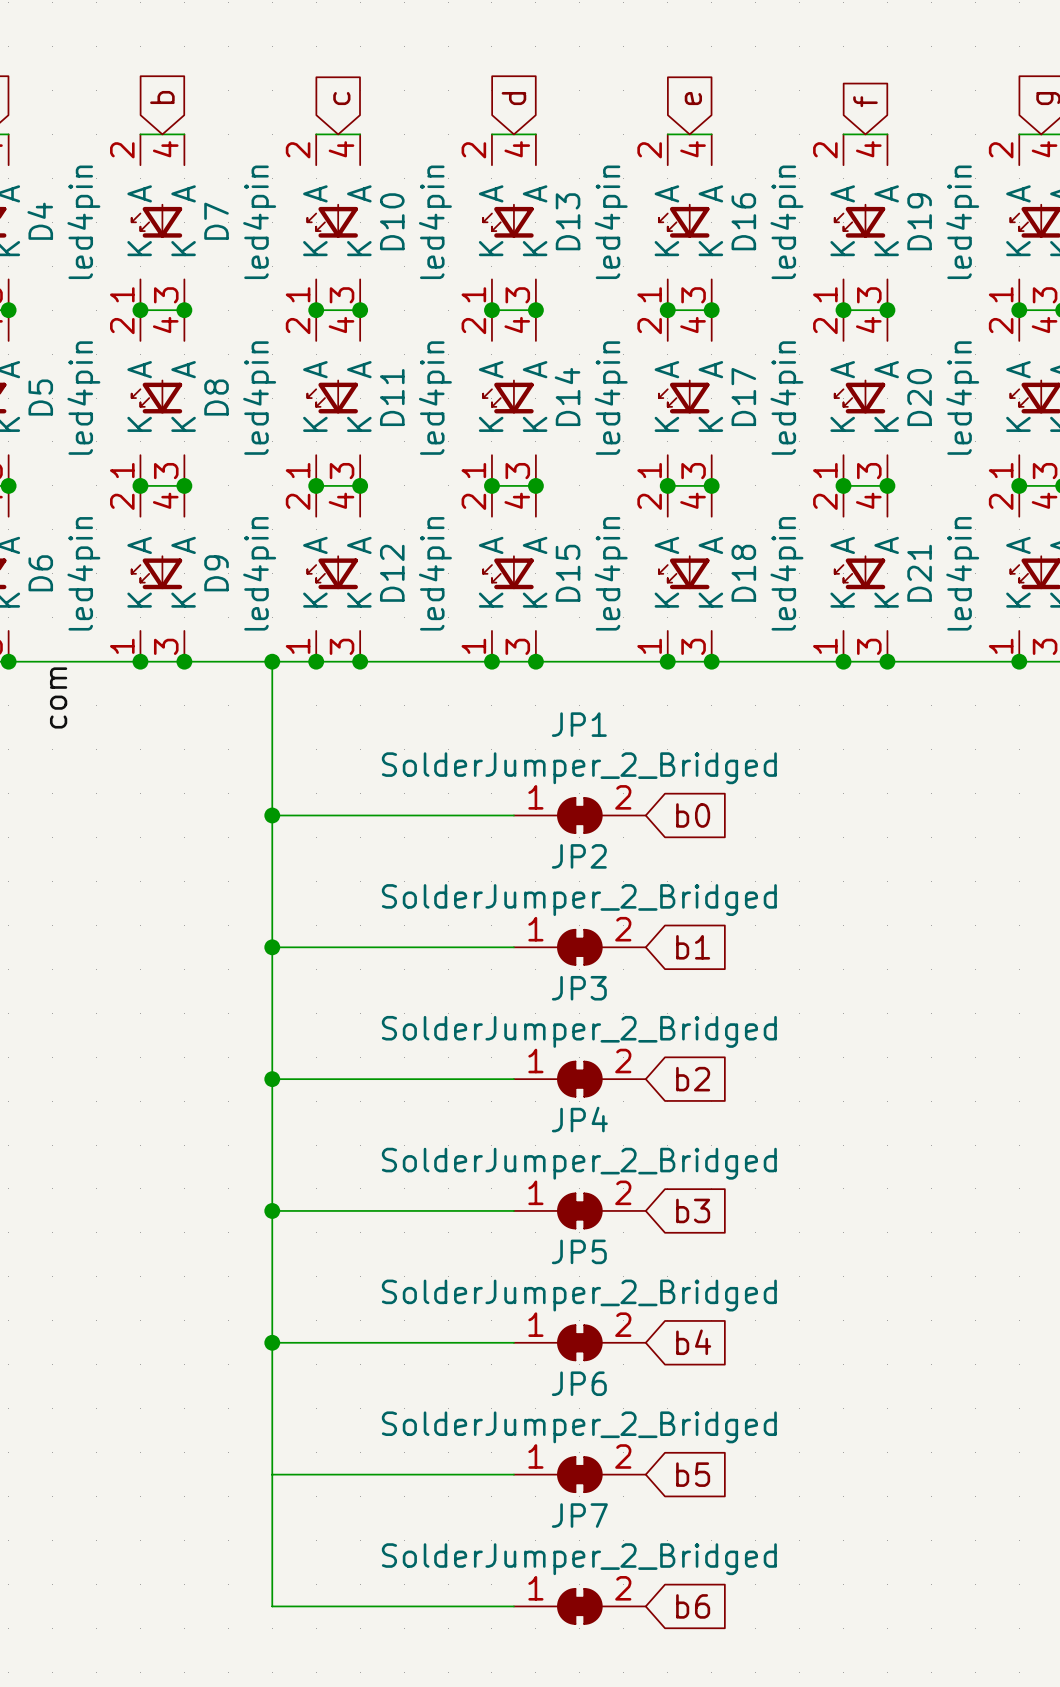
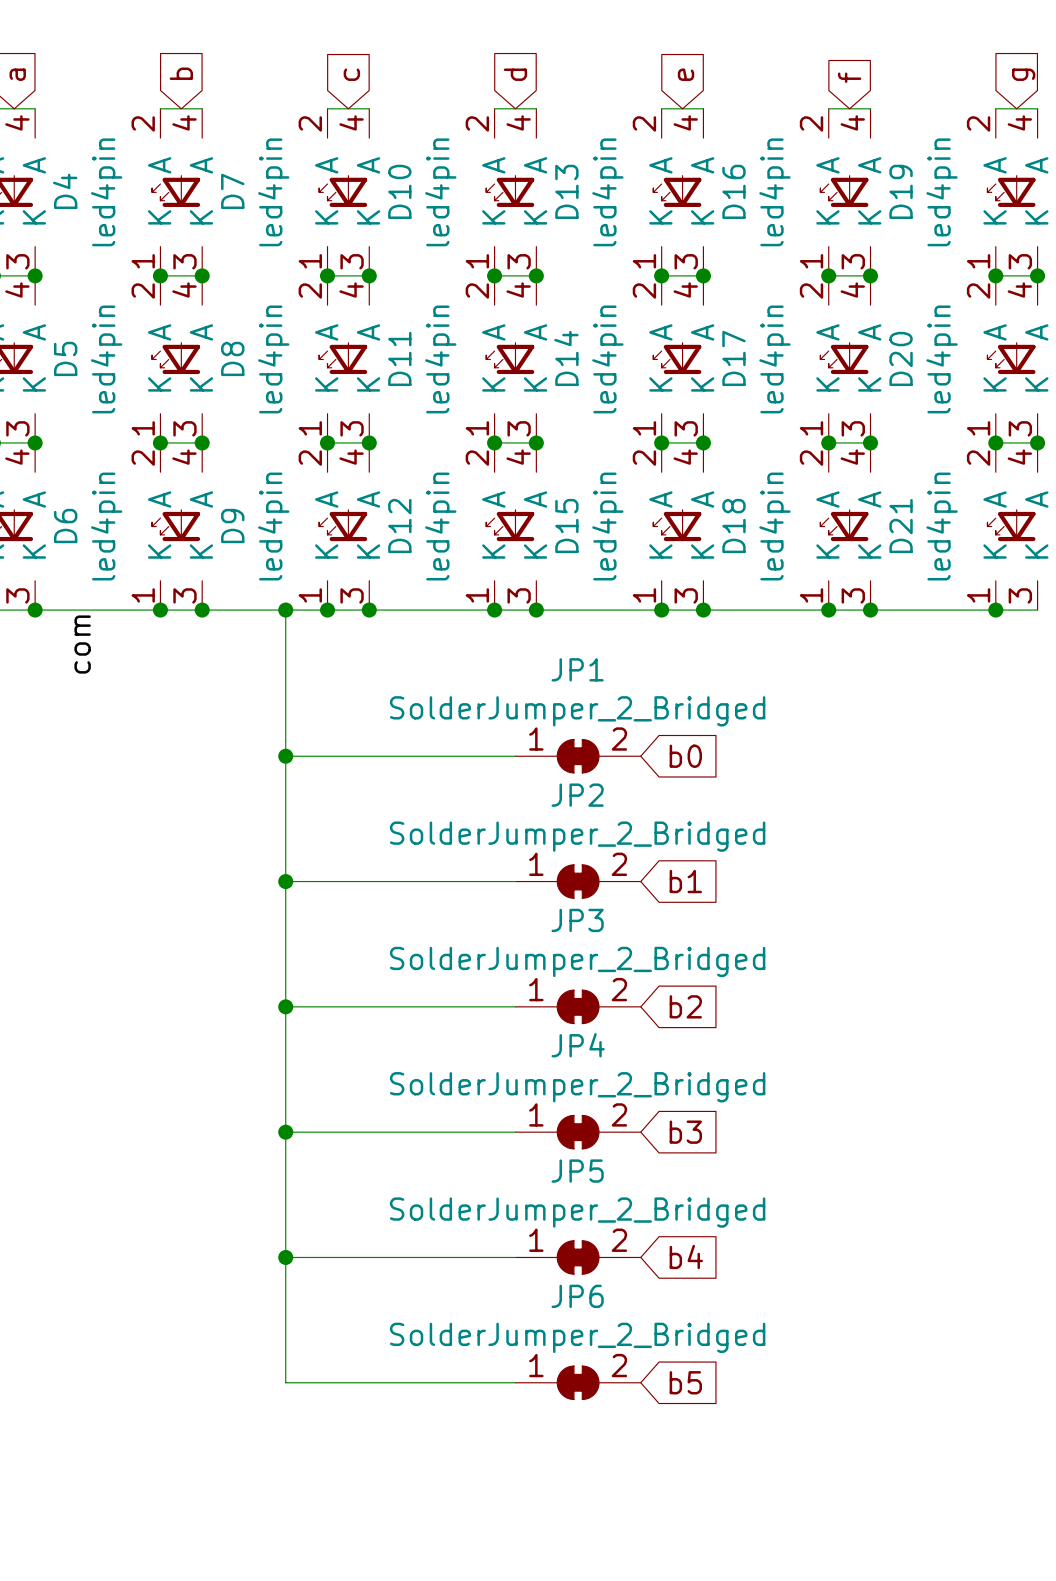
wire: (272, 1474) (272, 1606) (513, 1606) -> none
JP7: SolderJumper_2_Bridged (579, 1606) -> none
global label: b6 (693, 1606) -> none

